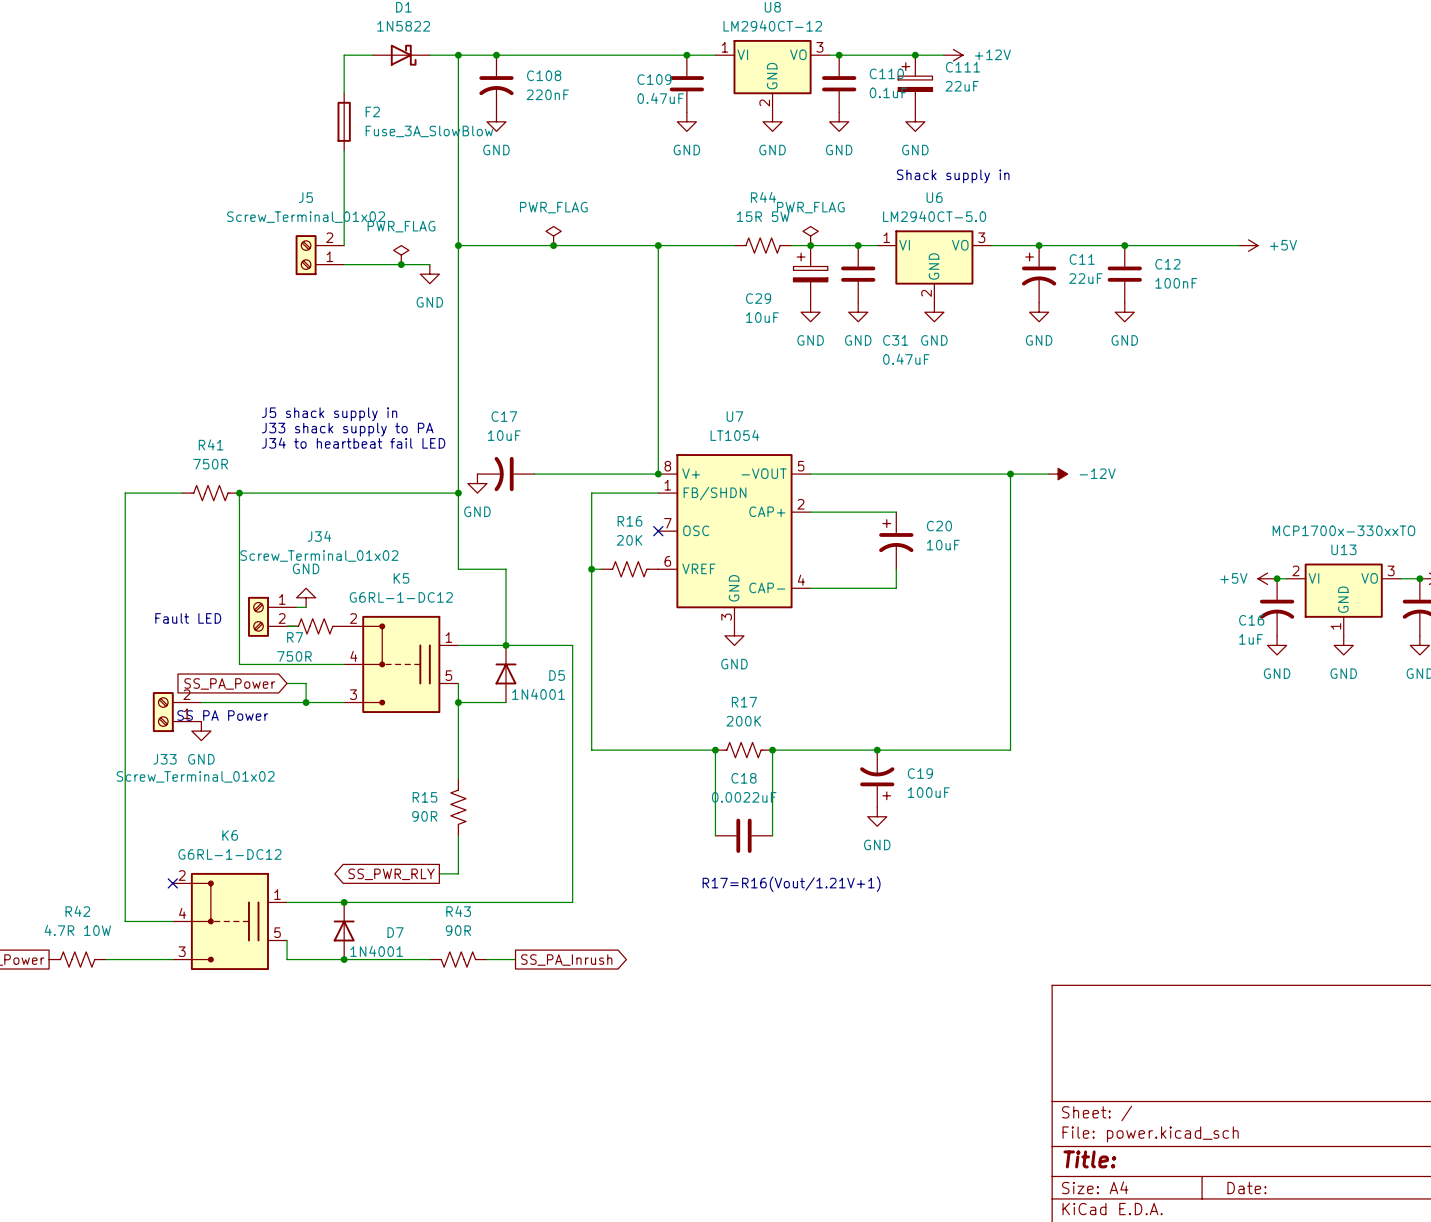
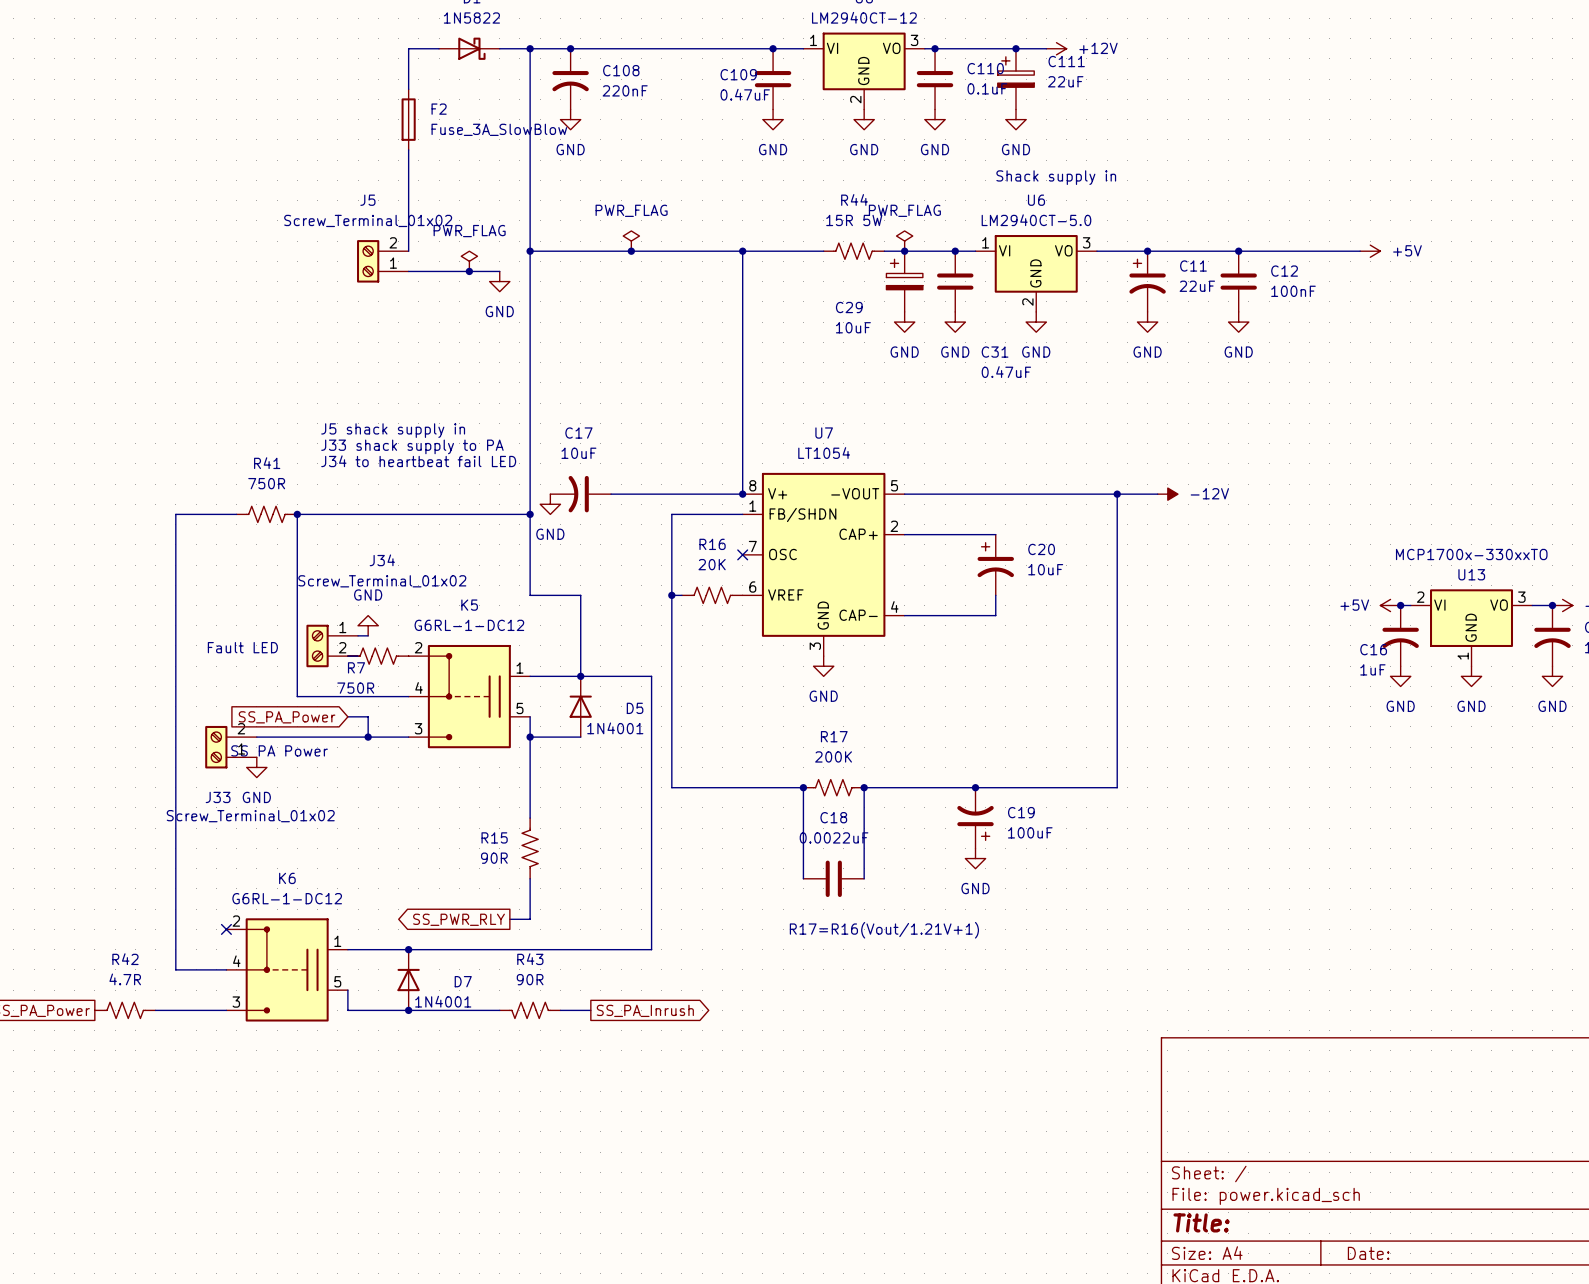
R42 value: 4.7R 10W (77, 930) -> 4.7R (125, 979)

